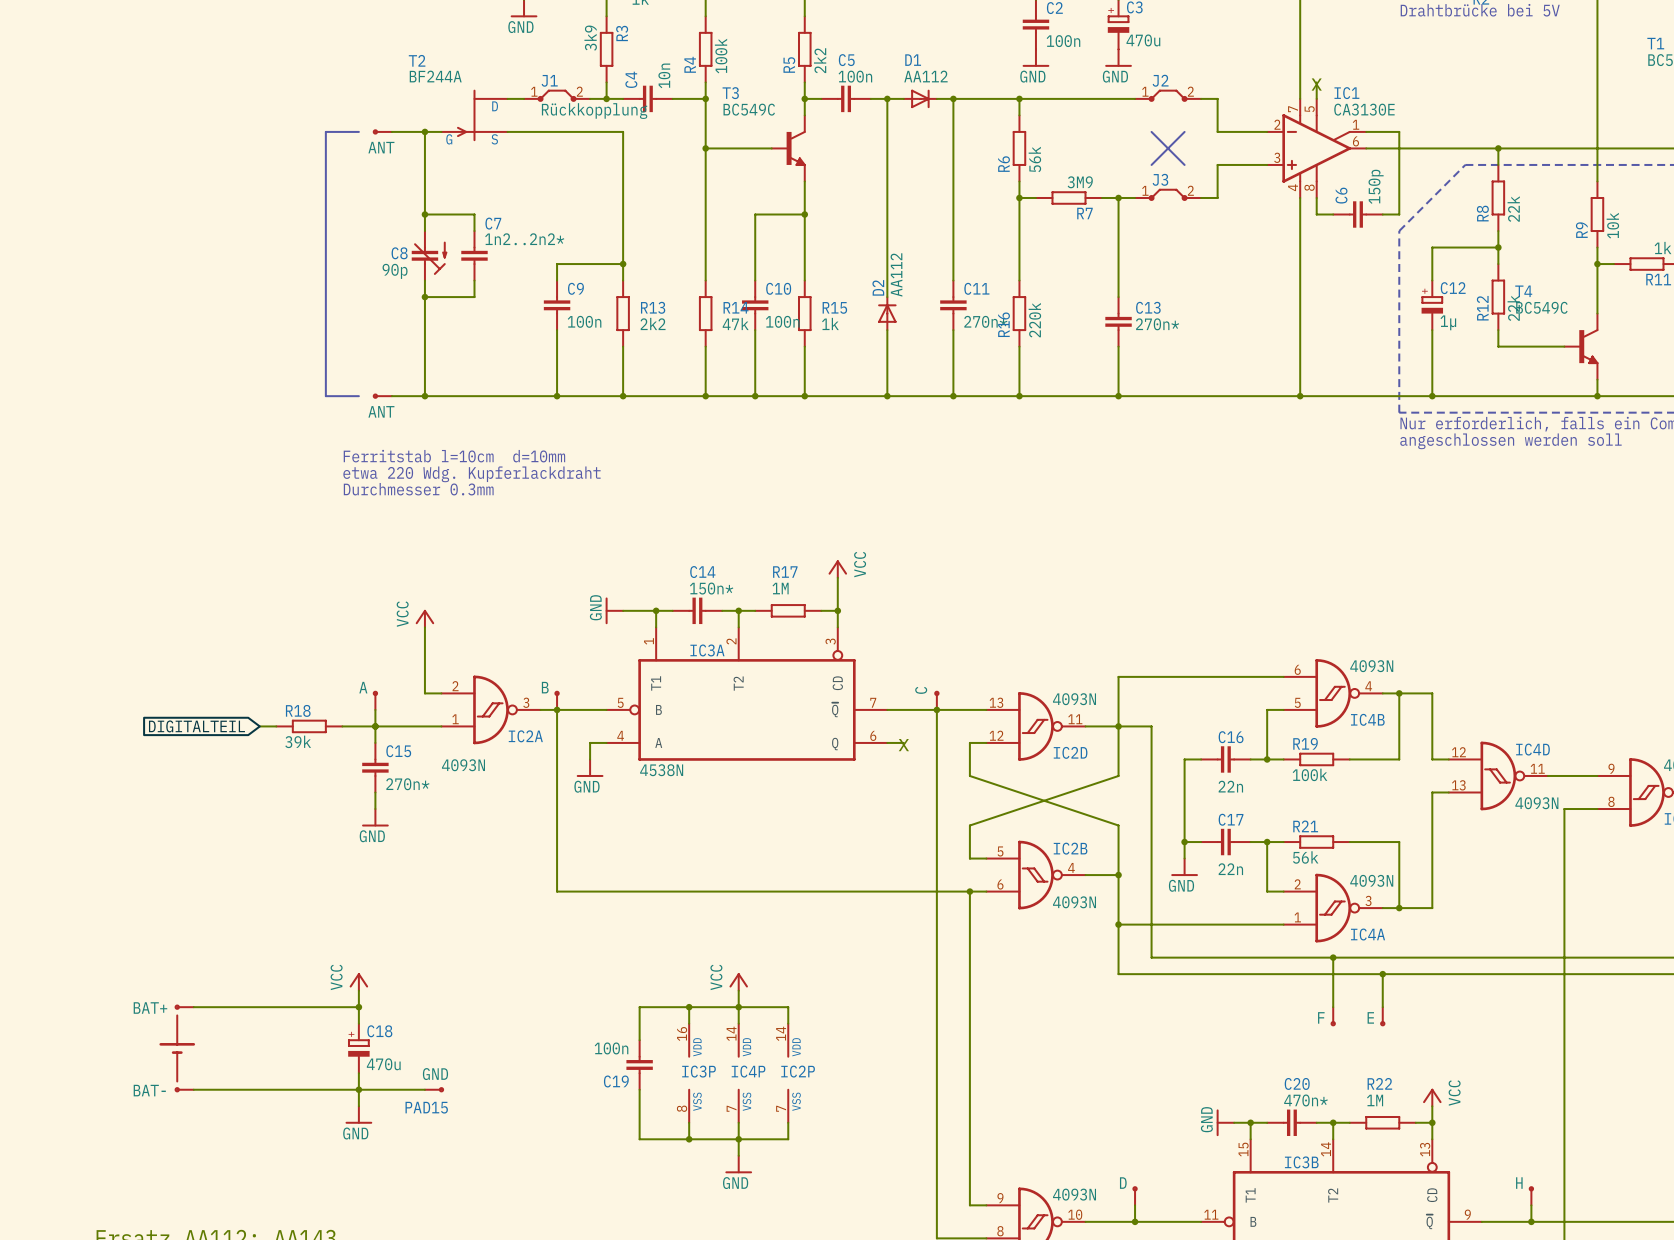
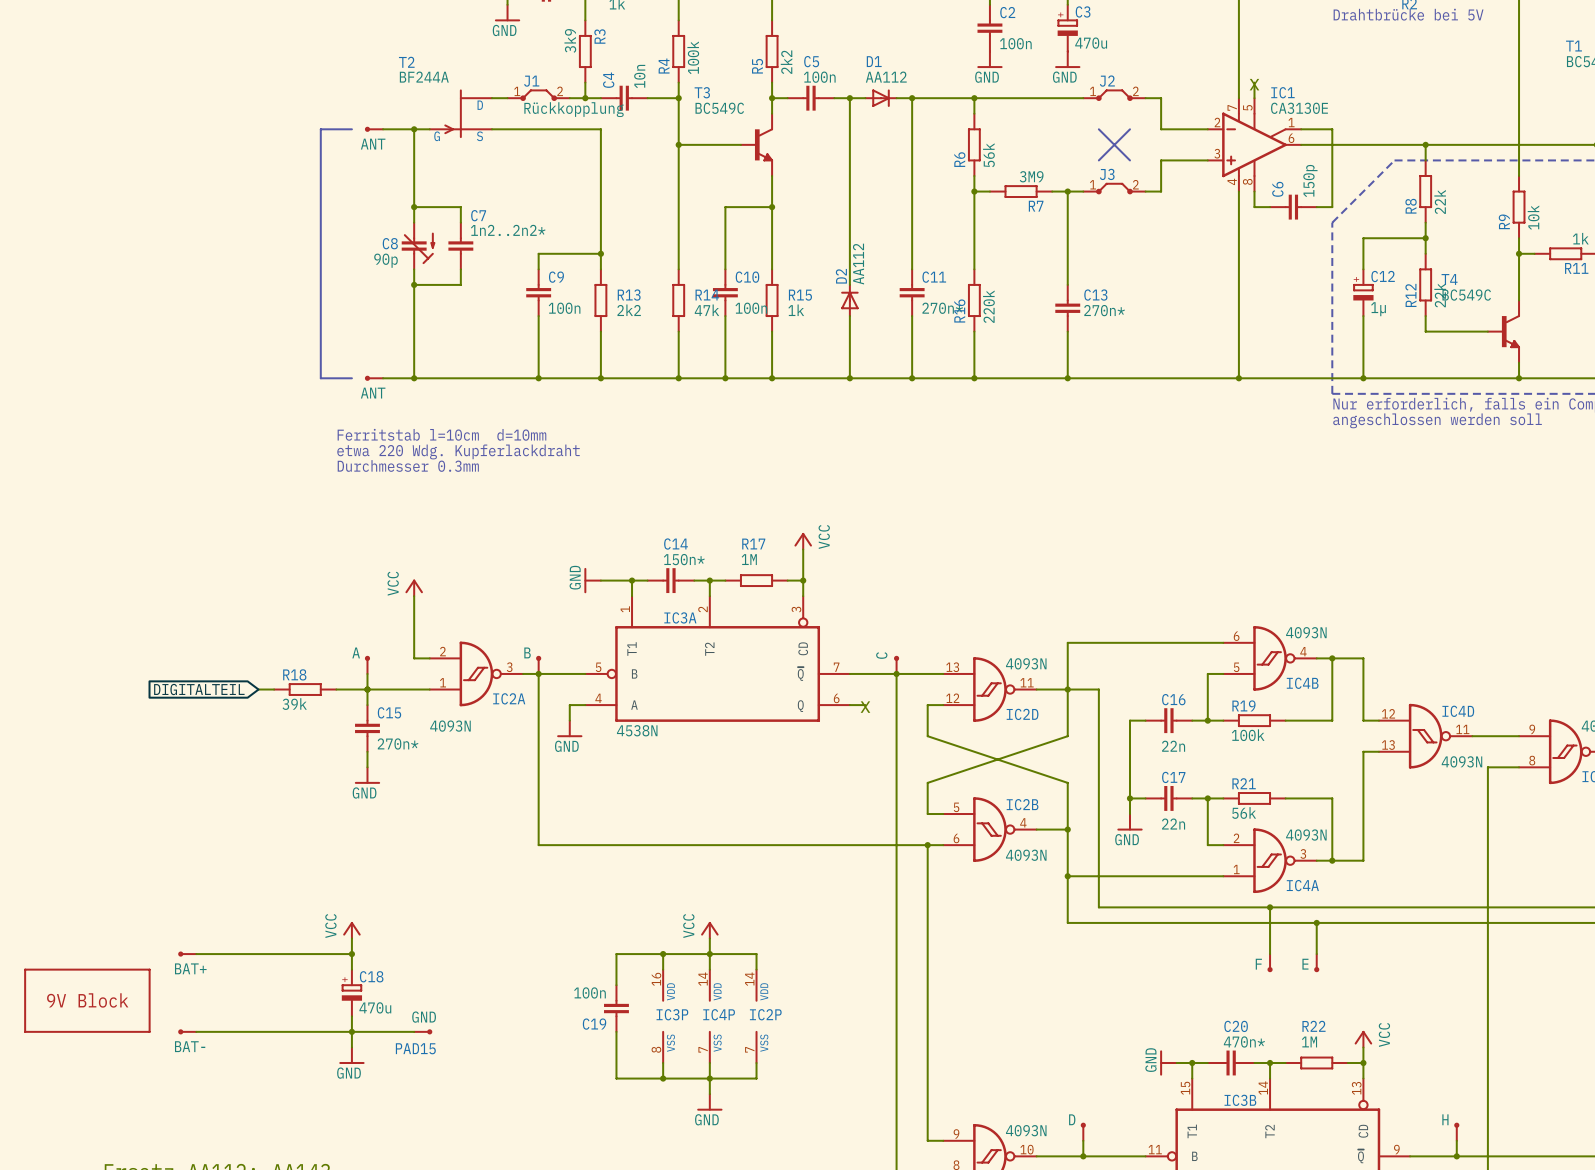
part value position: BAT+ (150, 1008) -> BAT+ (190, 968)
part: (177, 1048) -> none
part: none -> (87, 1000)
part value position: BAT- (149, 1090) -> BAT- (190, 1046)

